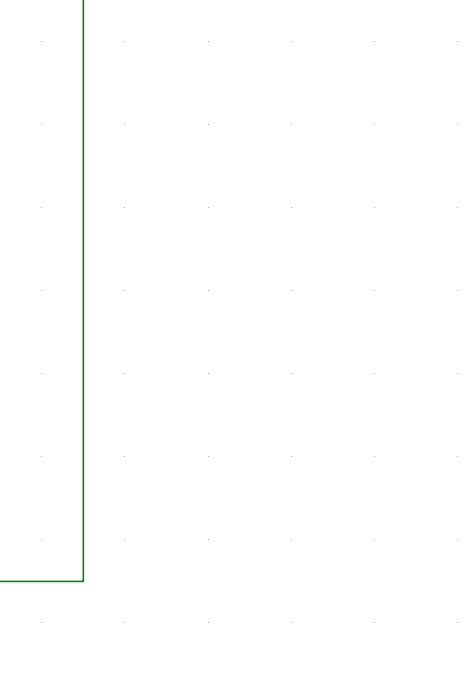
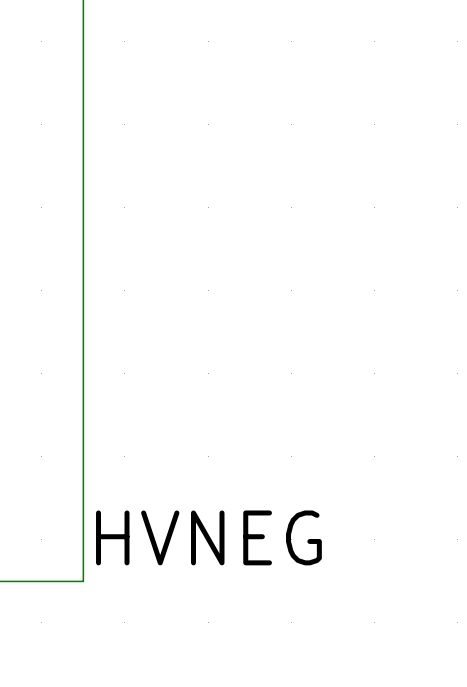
label: none -> HVNEG (208, 537)

